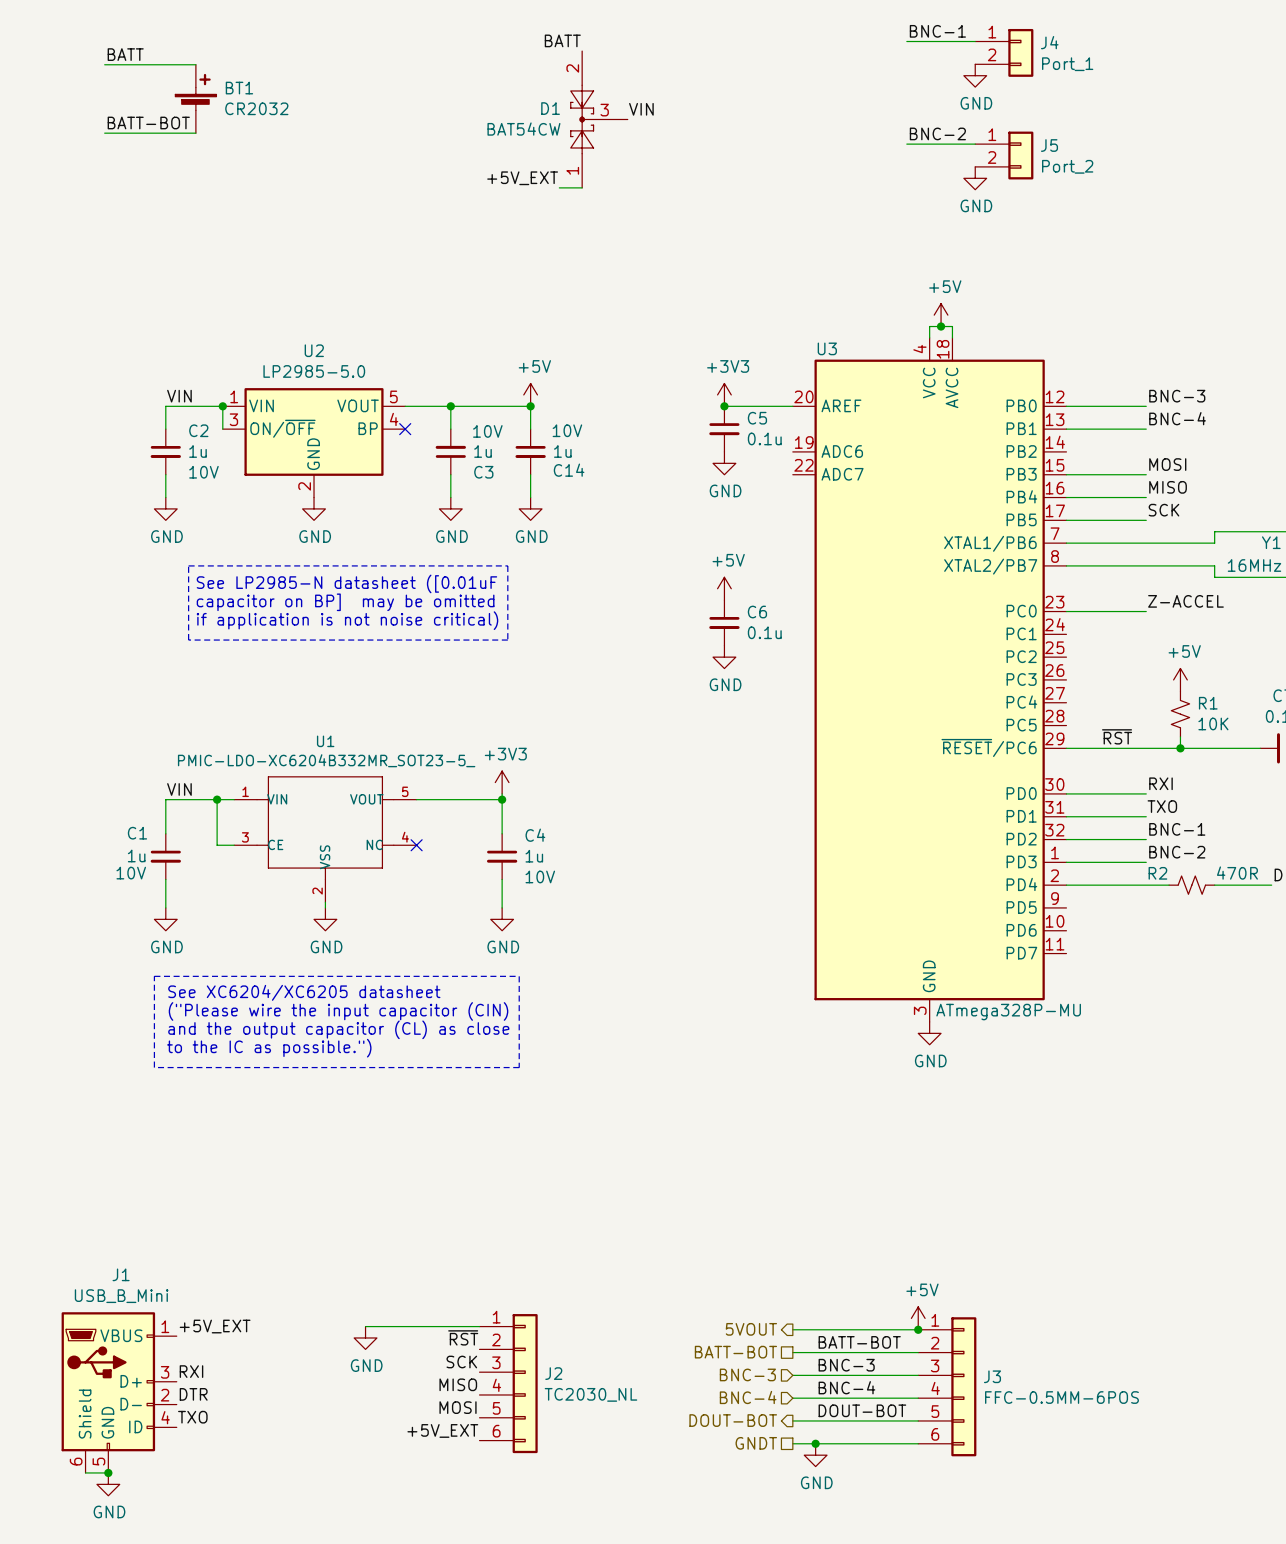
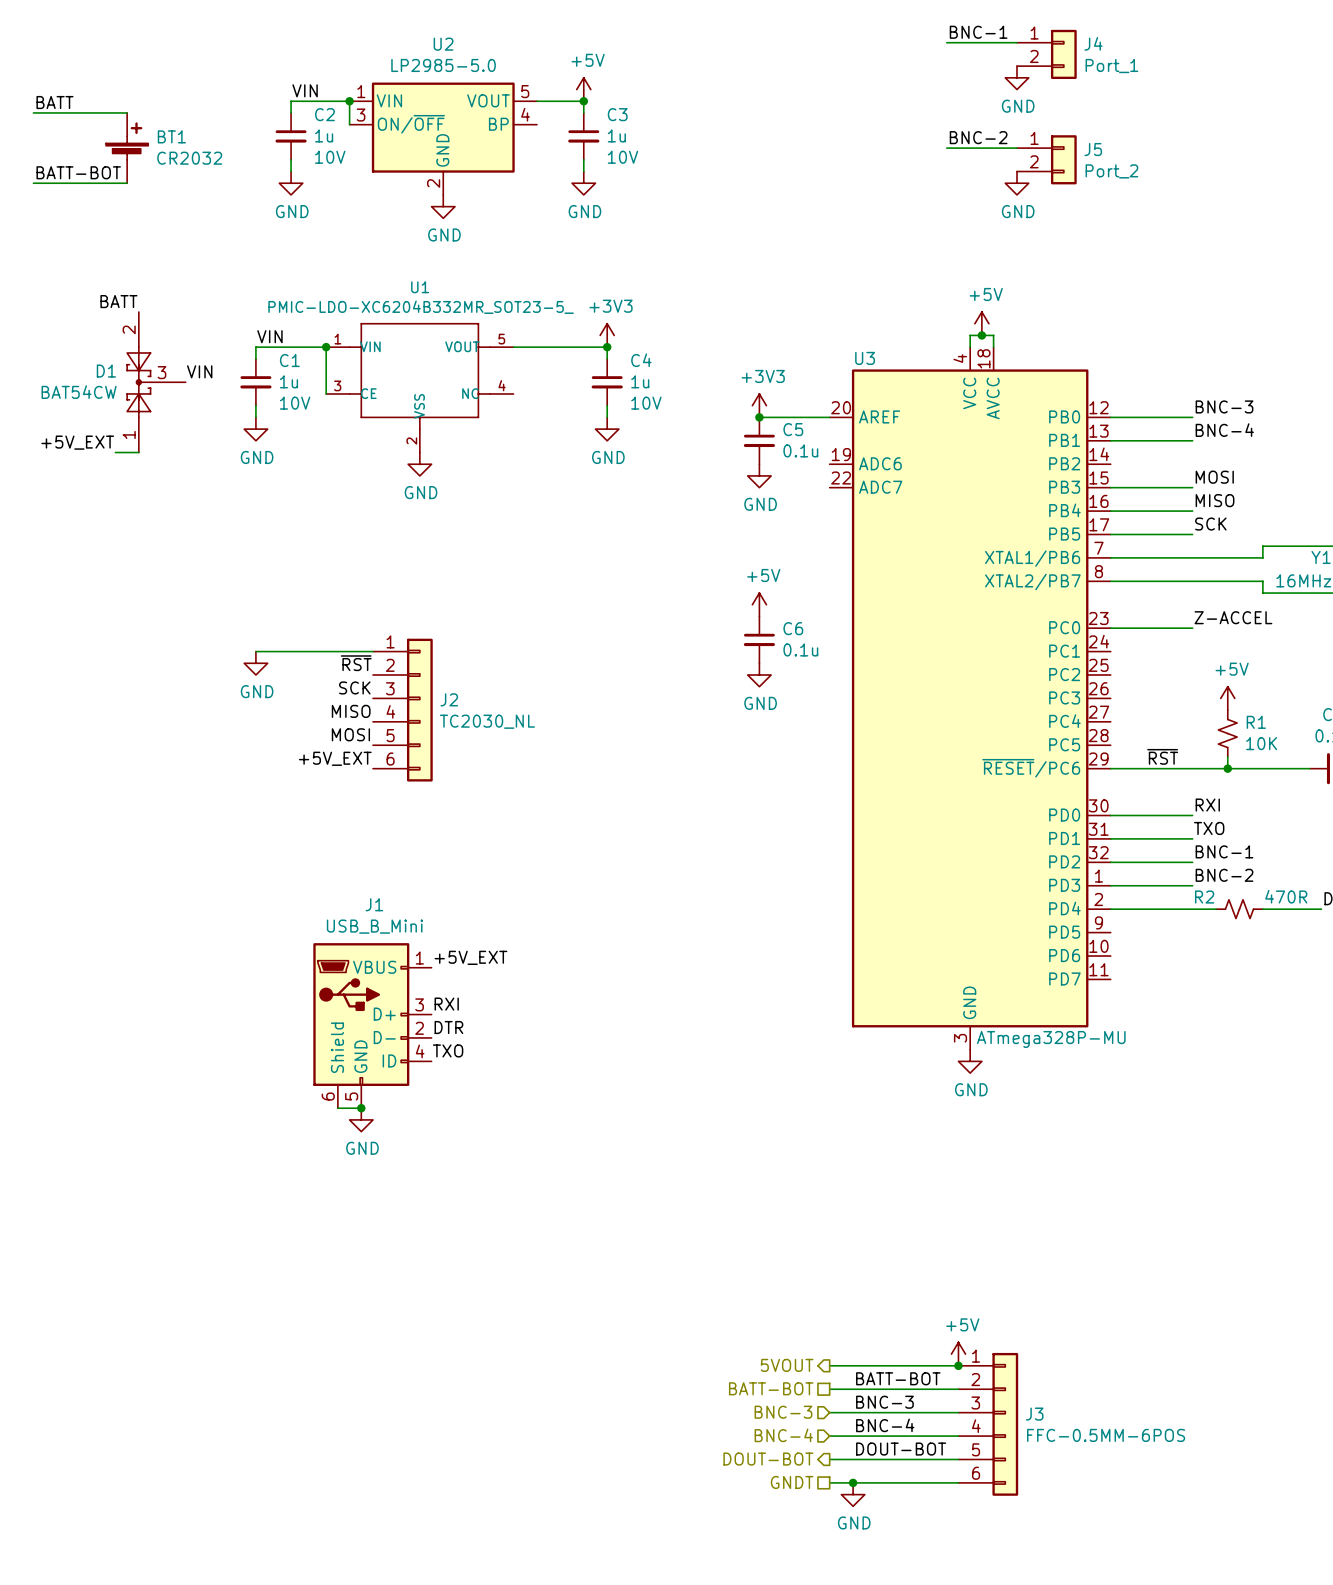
label: BATT (562, 40) -> none
label position: BATT (125, 54) -> BATT (55, 102)
wire: (104, 64) (195, 64) -> (33, 112) (127, 112)
power symbol: none -> +5V (583, 89)
label: none -> VIN (305, 90)
BT1 position: (195, 98) -> (127, 148)
junction: none -> (349, 101)
wire: none -> (536, 101) (583, 101) (583, 112)
junction: none -> (583, 101)
wire: none -> (291, 112) (291, 101) (349, 101) (349, 124)
label: VIN (641, 109) -> none
D1 position: (599, 119) -> (156, 382)
label position: BATT-BOT (148, 122) -> BATT-BOT (78, 172)
wire: (104, 133) (195, 133) -> (33, 183) (127, 183)
wire: none -> (291, 159) (291, 171)
wire: none -> (583, 159) (583, 171)
power symbol: none -> GND (291, 183)
label: +5V_EXT (522, 178) -> none
power symbol: none -> GND (583, 183)
wire: (559, 187) (582, 187) -> none
power symbol: none -> GND (443, 206)
label: none -> BATT (118, 301)
power symbol: none -> +3V3 (607, 335)
label: none -> VIN (269, 336)
junction: none -> (326, 347)
wire: none -> (513, 347) (607, 347) (607, 358)
junction: none -> (607, 347)
wire: none -> (255, 358) (255, 347) (326, 347) (326, 393)
power symbol: +5V (530, 394) -> none
wire: none -> (607, 405) (607, 417)
label position: VIN (179, 396) -> VIN (199, 371)
junction: (222, 406) -> none
wire: (405, 406) (530, 406) (530, 429) -> none
wire: (450, 406) (450, 429) -> none
junction: (450, 406) -> none
junction: (530, 406) -> none
power symbol: none -> GND (255, 429)
power symbol: none -> GND (607, 429)
wire: (165, 429) (165, 406) (222, 406) (222, 429) -> none
no-connect mark: (405, 429) -> none
label: none -> +5V_EXT (77, 442)
C3 text position: 10V (487, 431) -> 10V (622, 157)
wire: none -> (115, 452) (138, 452)
U2 position: (314, 442) -> (443, 138)
C2 position: (165, 451) -> (291, 136)
power symbol: none -> GND (419, 464)
C3 rotation: 0° (450, 451) -> 180° (583, 136)
C3 position: (450, 451) -> (583, 136)
C14: 1u (530, 451) -> none
C3 name position: C3 (483, 472) -> C3 (617, 114)
wire: (165, 474) (165, 497) -> none
wire: (450, 474) (450, 497) -> none
wire: (530, 474) (530, 497) -> none
power symbol: GND (165, 508) -> none
power symbol: GND (314, 508) -> none
power symbol: GND (450, 508) -> none
power symbol: GND (530, 508) -> none
line: (188, 565) (507, 565) (507, 640) (188, 640) (188, 565) -> none
text: See LP2985-N datasheet ([0.01uF (346, 583) -> none
text: capacitor on BP] may be omitted (345, 602) -> none
text: if application is not noise critical) (347, 620) -> none
wire: none -> (255, 651) (373, 651)
power symbol: none -> GND (255, 663)
label: none -> ~{RST} (356, 663)
label: none -> SCK (354, 687)
label: none -> MISO (351, 711)
label: none -> MOSI (350, 734)
label: none -> +5V_EXT (335, 758)
power symbol: +3V3 (502, 782) -> none
label: VIN (179, 789) -> none
wire: (502, 793) (502, 833) -> none
wire: (217, 799) (217, 845) (234, 845) -> none
junction: (217, 799) -> none
wire: (234, 799) (165, 799) (165, 833) -> none
wire: (416, 799) (502, 799) -> none
junction: (502, 799) -> none
C1 name position: C1 (137, 833) -> C1 (289, 360)
U1 position: (325, 839) -> (419, 388)
no-connect mark: (416, 845) -> none
C1 value position: 1u (136, 855) -> 1u (288, 381)
C1 position: (165, 856) -> (255, 382)
C4 position: (502, 856) -> (607, 382)
C1 text position: 10V (131, 873) -> 10V (295, 403)
wire: (165, 879) (165, 907) -> none
wire: (502, 879) (502, 907) -> none
wire: (325, 902) (325, 907) -> none
power symbol: GND (165, 919) -> none
power symbol: GND (325, 919) -> none
power symbol: GND (502, 919) -> none
label: none -> +5V_EXT (470, 957)
line: (154, 976) (519, 976) (519, 1067) (154, 1067) (154, 976) -> none
label: none -> RXI (446, 1004)
text: See XC6204/XC6205 datasheet (304, 992) -> none
label: none -> DTR (448, 1027)
text: ("Please wire the input capacitor (CIN) (338, 1011) -> none
label: none -> TXO (448, 1050)
text: and the output capacitor (CL) as close (338, 1029) -> none
text: to the IC as possible.") (269, 1048) -> none
wire: none -> (337, 1108) (361, 1108)
junction: none -> (361, 1108)
power symbol: none -> GND (361, 1119)
label: +5V_EXT (215, 1326) -> none
wire: (365, 1326) (479, 1326) -> none
power symbol: GND (365, 1337) -> none
label: ~{RST} (463, 1337) -> none
label: SCK (461, 1362) -> none
label: RXI (191, 1371) -> none
J2 position: (508, 1383) -> (402, 710)
label: MISO (458, 1384) -> none
J1 position: (119, 1392) -> (372, 1025)
label: DTR (193, 1394) -> none
label: MOSI (458, 1407) -> none
label: TXO (192, 1417) -> none
label: +5V_EXT (442, 1430) -> none
wire: (85, 1472) (108, 1472) -> none
junction: (108, 1472) -> none
power symbol: GND (108, 1484) -> none

